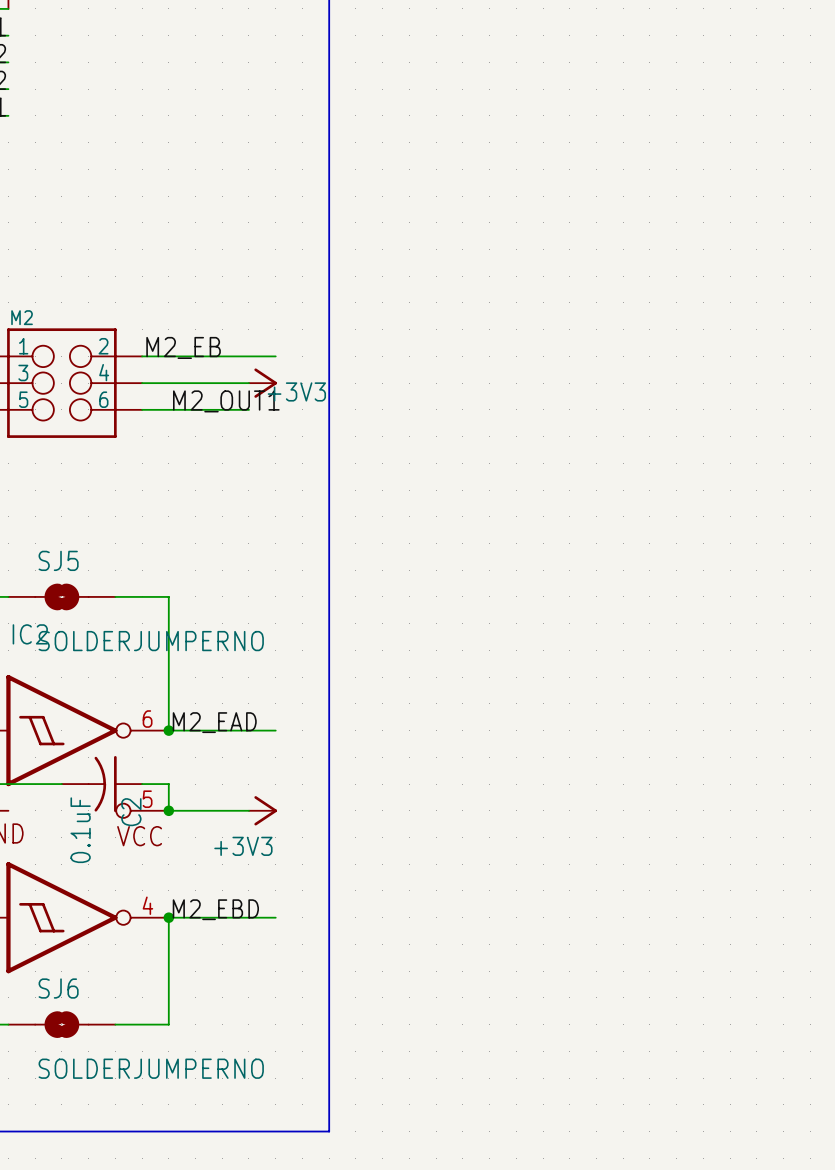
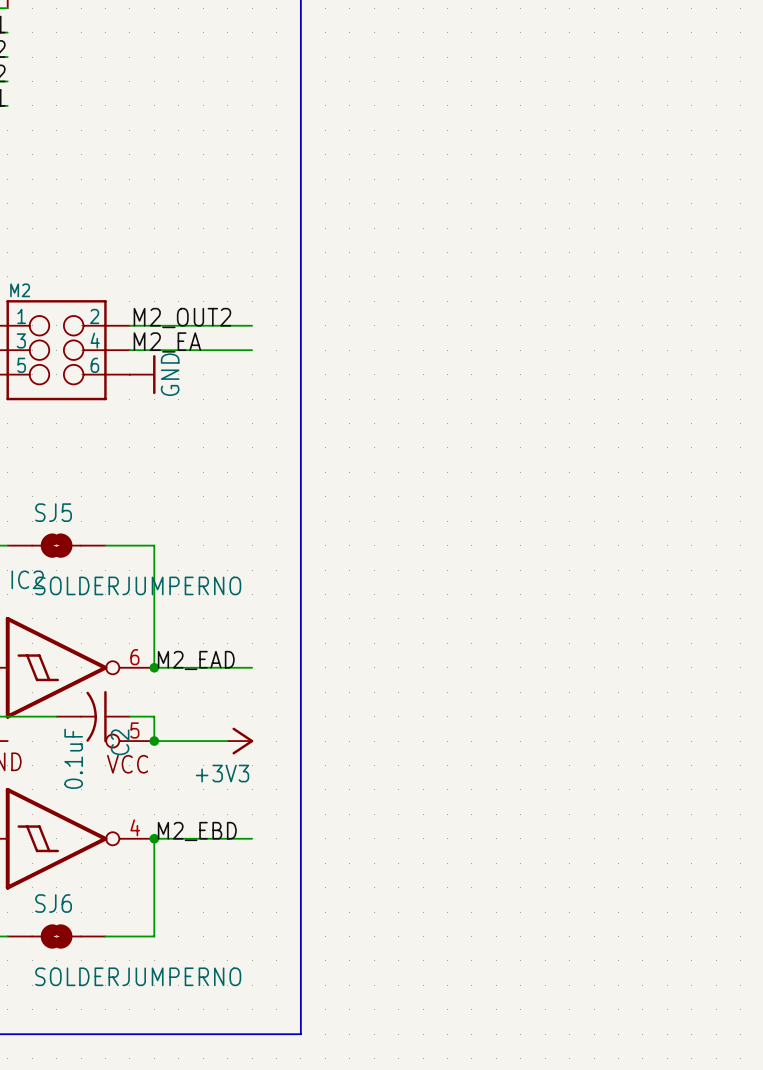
label: M2_EB (183, 347) -> M2_OUT2 (182, 318)
label: none -> M2_EA (167, 342)
power symbol: +3V3 (263, 383) -> none
label: M2_OUT1 (226, 401) -> none
wire: (142, 409) (248, 409) -> none
power symbol: none -> GND (142, 374)

